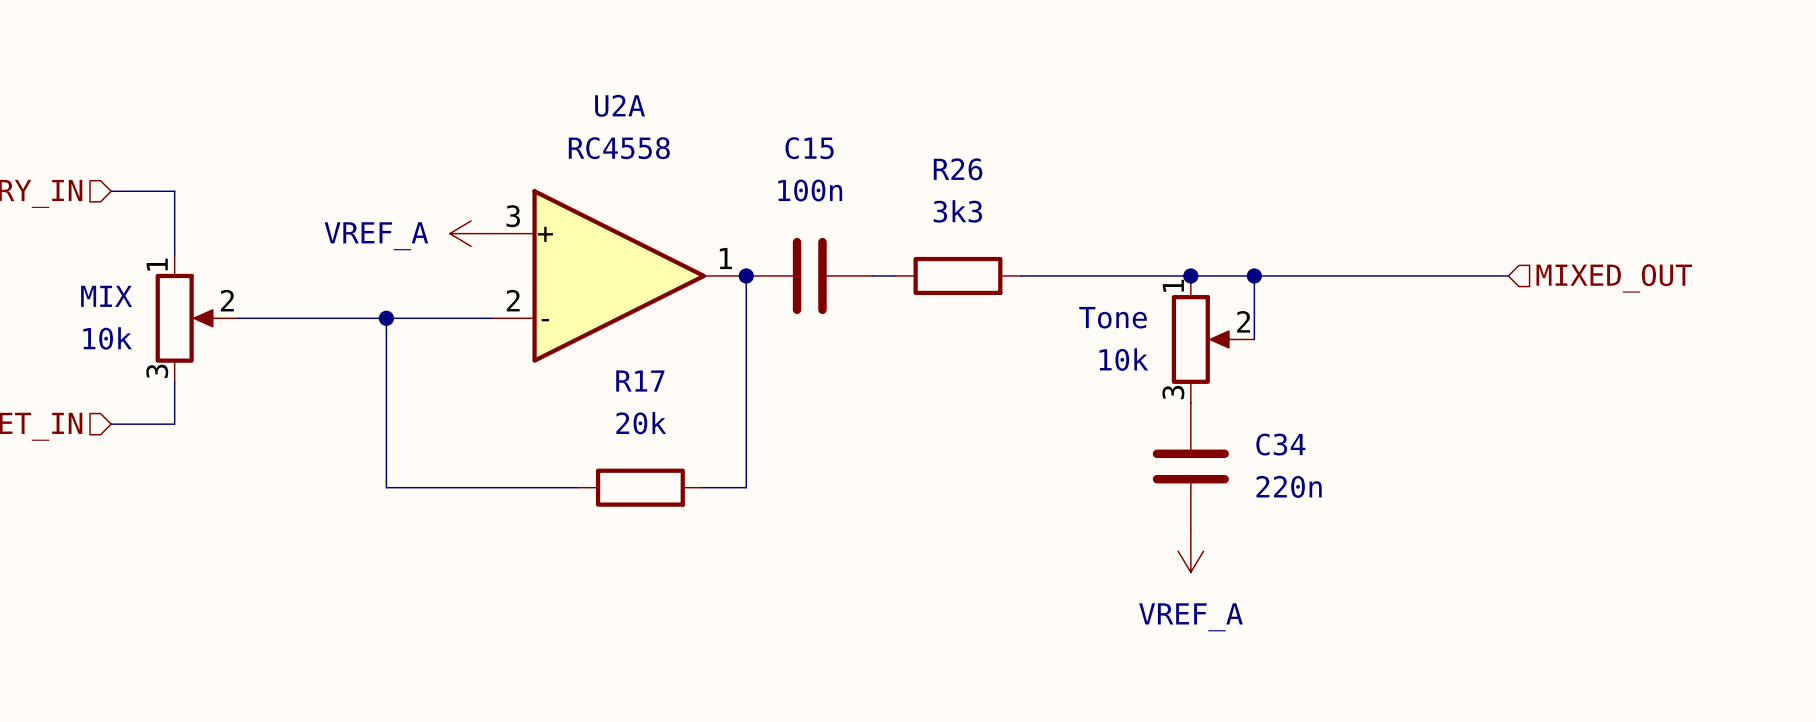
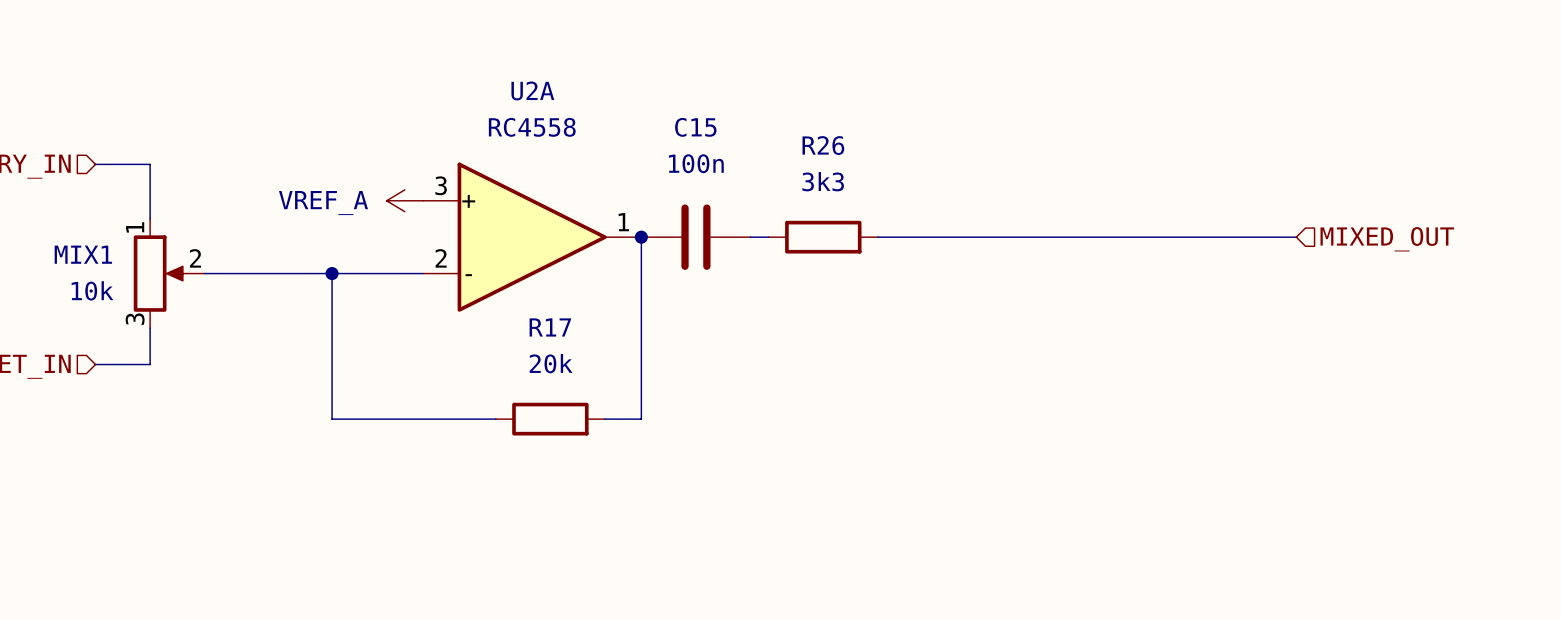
junction: (1190, 275) -> none
wire: (1254, 275) (1254, 339) -> none
junction: (1254, 275) -> none
MIX name: MIX (106, 296) -> MIX1 (83, 254)
Tone: 10k (1213, 339) -> none
C34: 220n (1190, 466) -> none
power symbol: VREF_A (1190, 551) -> none

